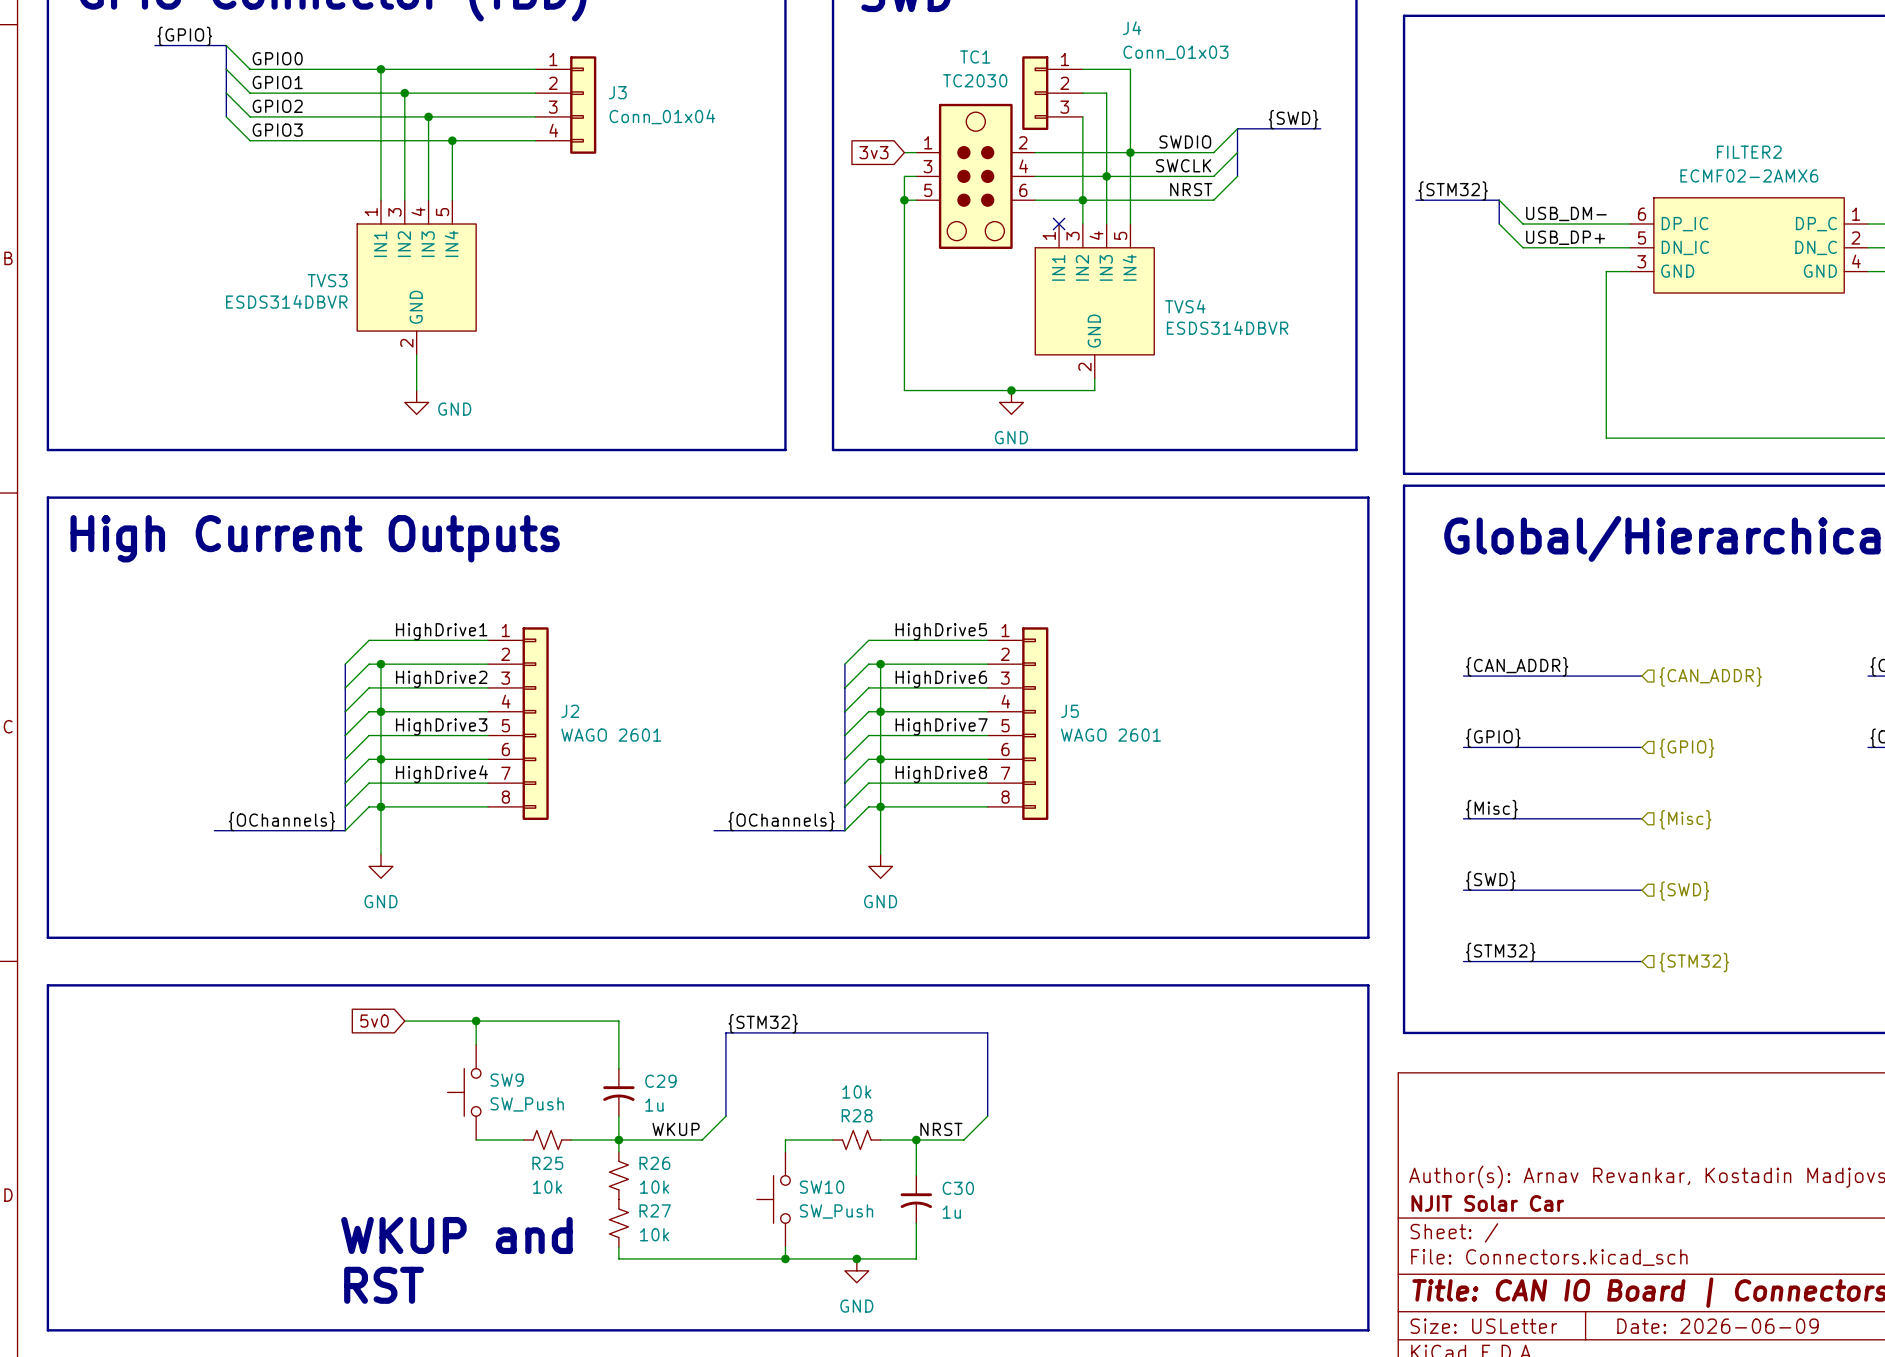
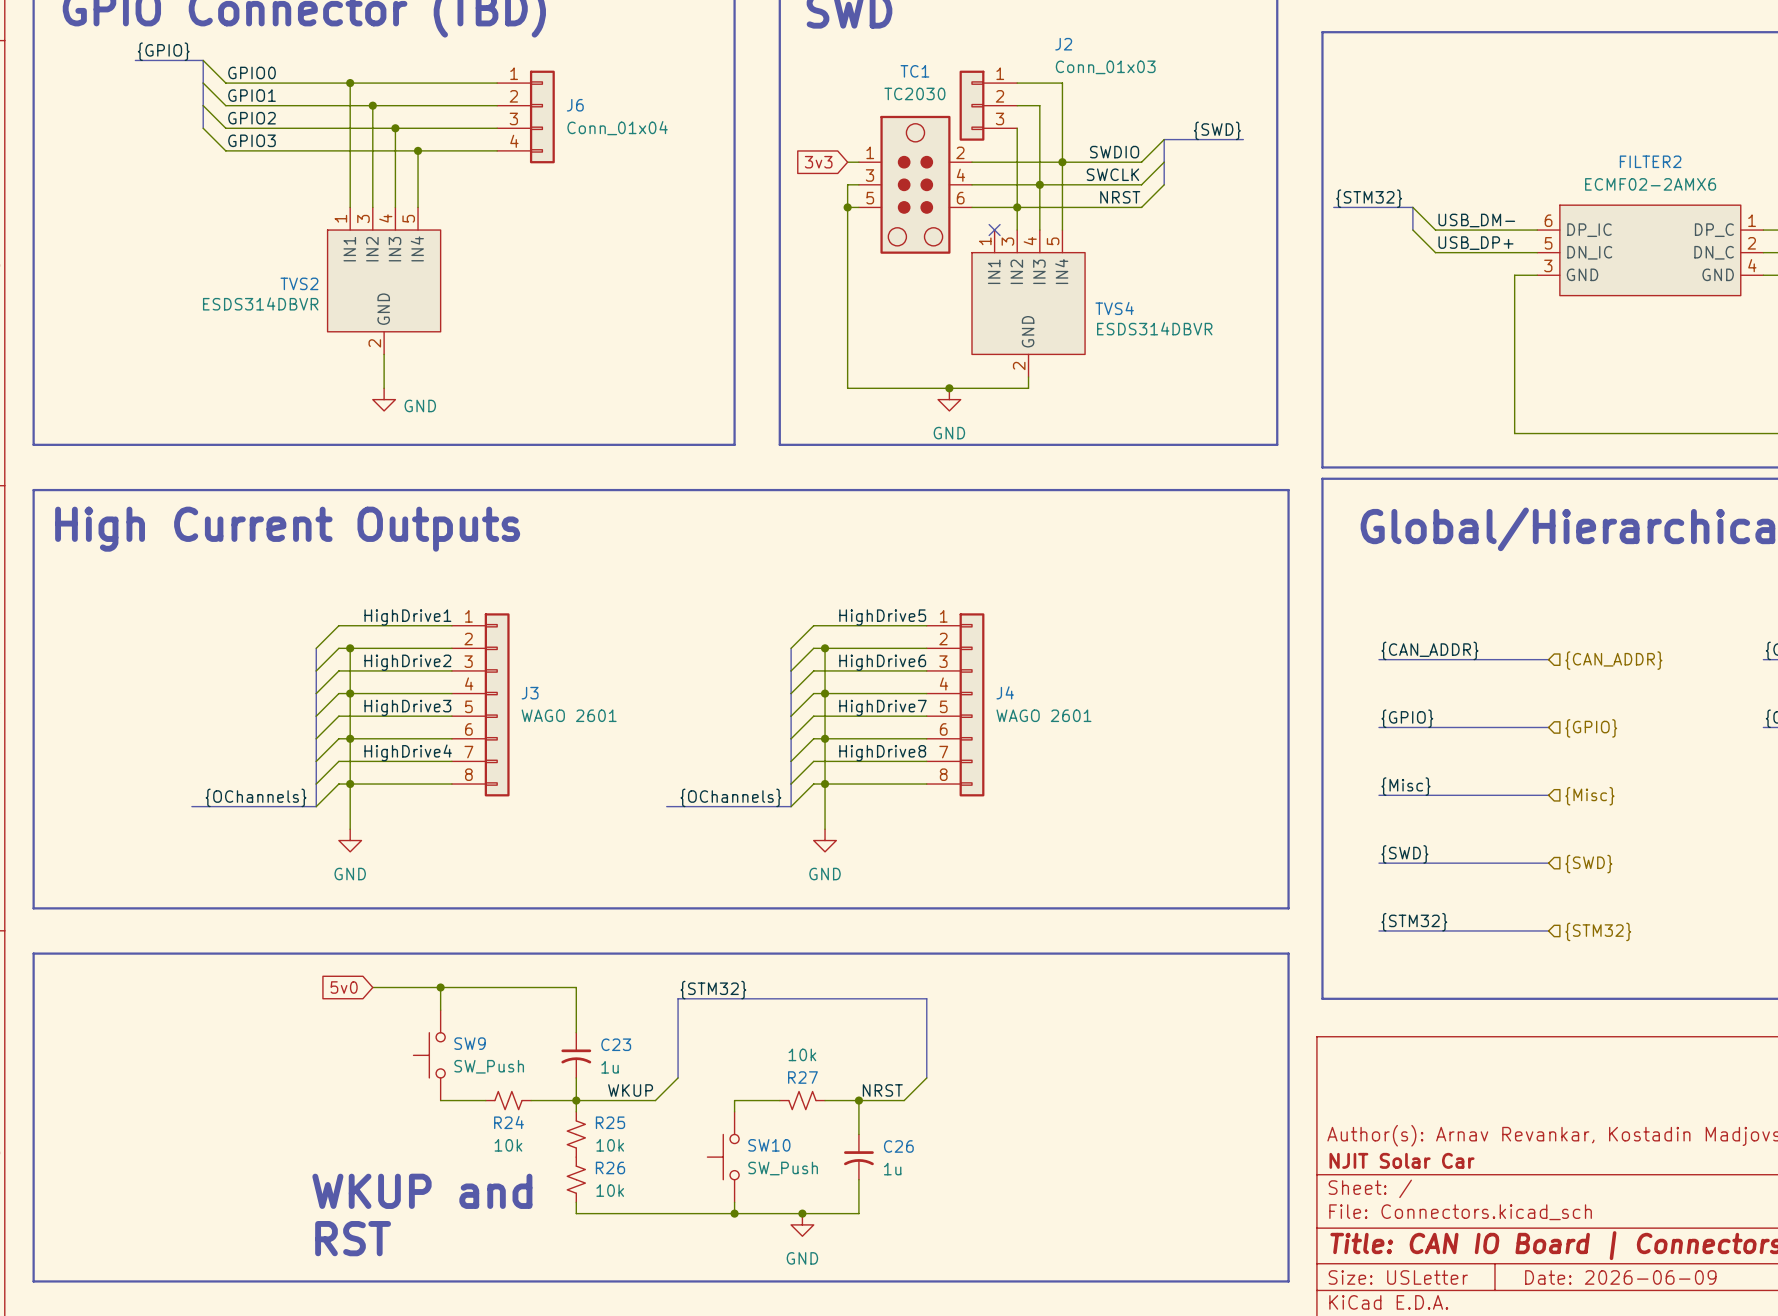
J4 name: J4 (1132, 28) -> J2 (1063, 44)
J3 name: J3 (617, 92) -> J6 (575, 105)
TVS3 name: TVS3 (327, 280) -> TVS2 (299, 283)
J2 name: J2 (570, 711) -> J3 (530, 693)
J5 name: J5 (1069, 711) -> J4 (1005, 692)
C29 name: C29 (660, 1081) -> C23 (616, 1044)
R28 name: R28 (857, 1115) -> R27 (802, 1077)
R25 name: R25 (547, 1163) -> R24 (509, 1122)
R26 name: R26 (654, 1163) -> R25 (610, 1122)
C30 name: C30 (958, 1188) -> C26 (898, 1146)
R27 name: R27 (655, 1210) -> R26 (610, 1167)

